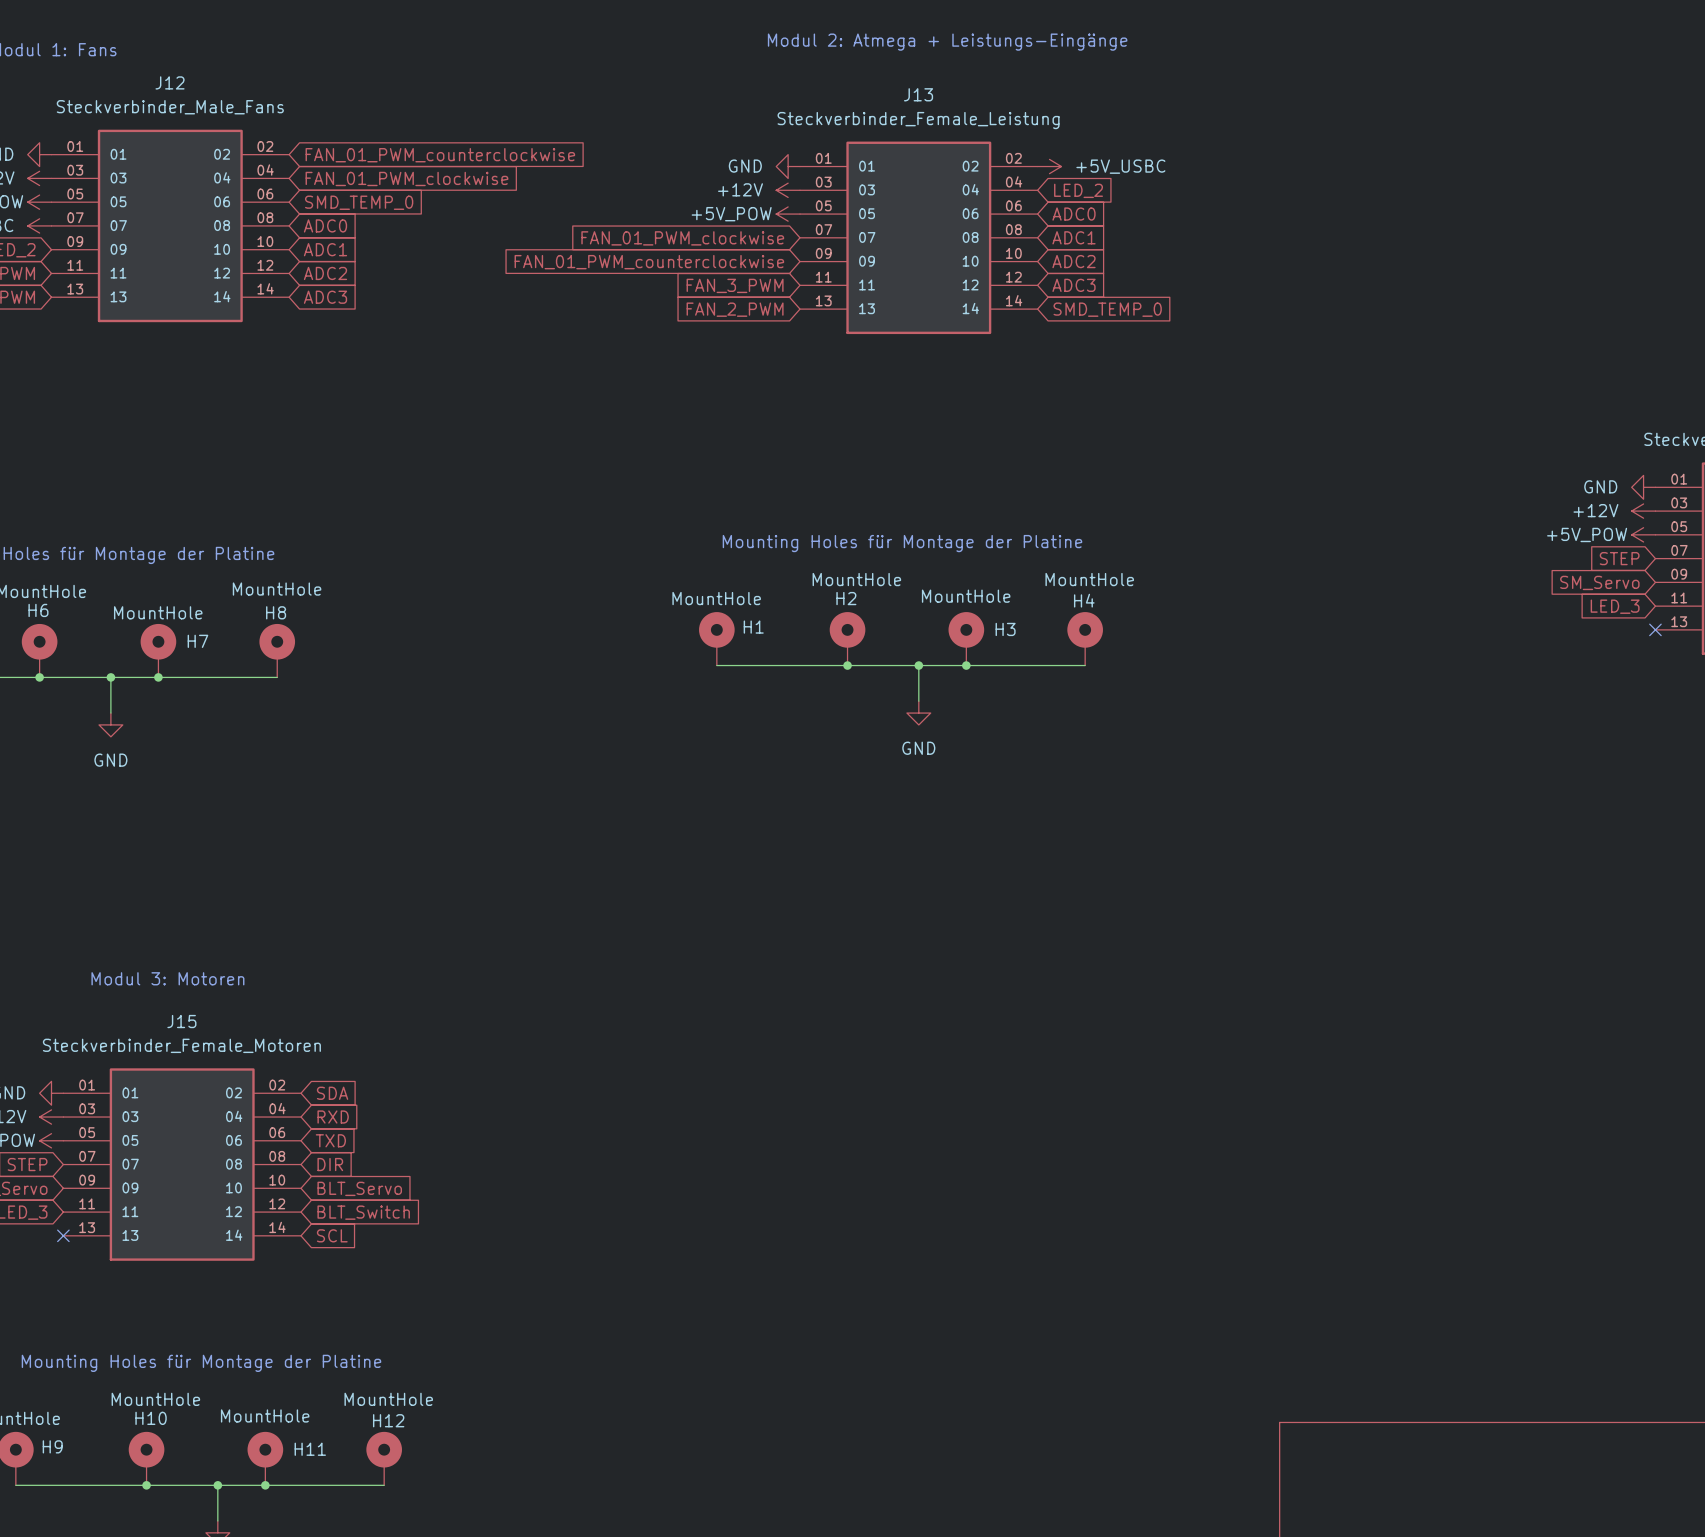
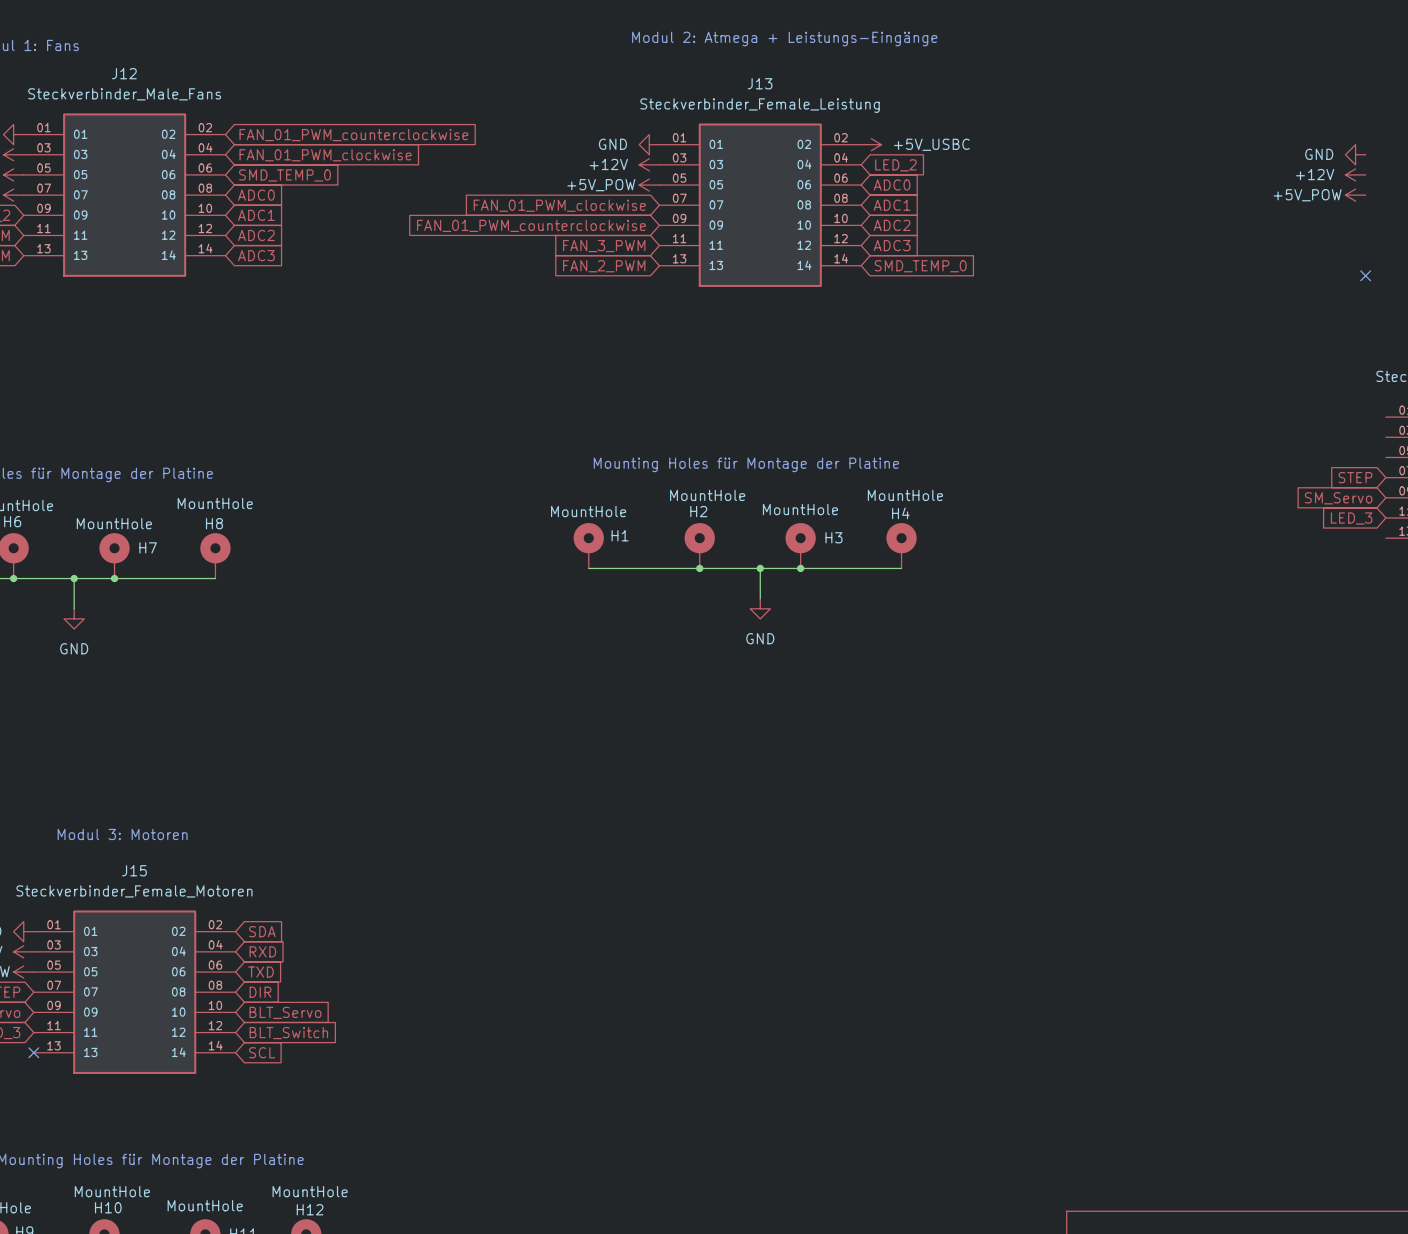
power symbol: none -> GND (1355, 154)
power symbol: none -> +12V (1355, 174)
power symbol: none -> +5V_POW (1355, 195)
no-connect mark: none -> (1365, 275)
power symbol: GND (1643, 487) -> none
power symbol: +12V (1643, 511) -> none
power symbol: +5V_POW (1643, 534) -> none
no-connect mark: (1655, 629) -> none

